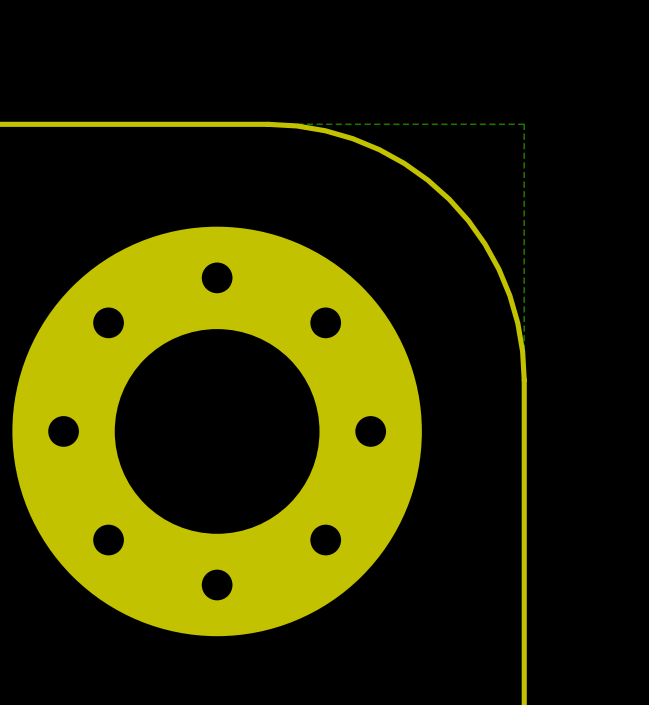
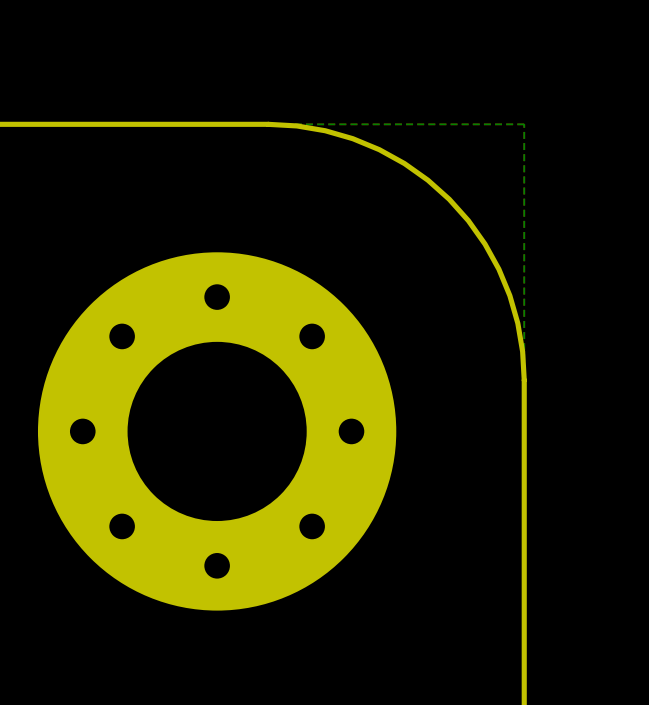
part footprint: [12, 226, 422, 637] -> [37, 252, 397, 611]

